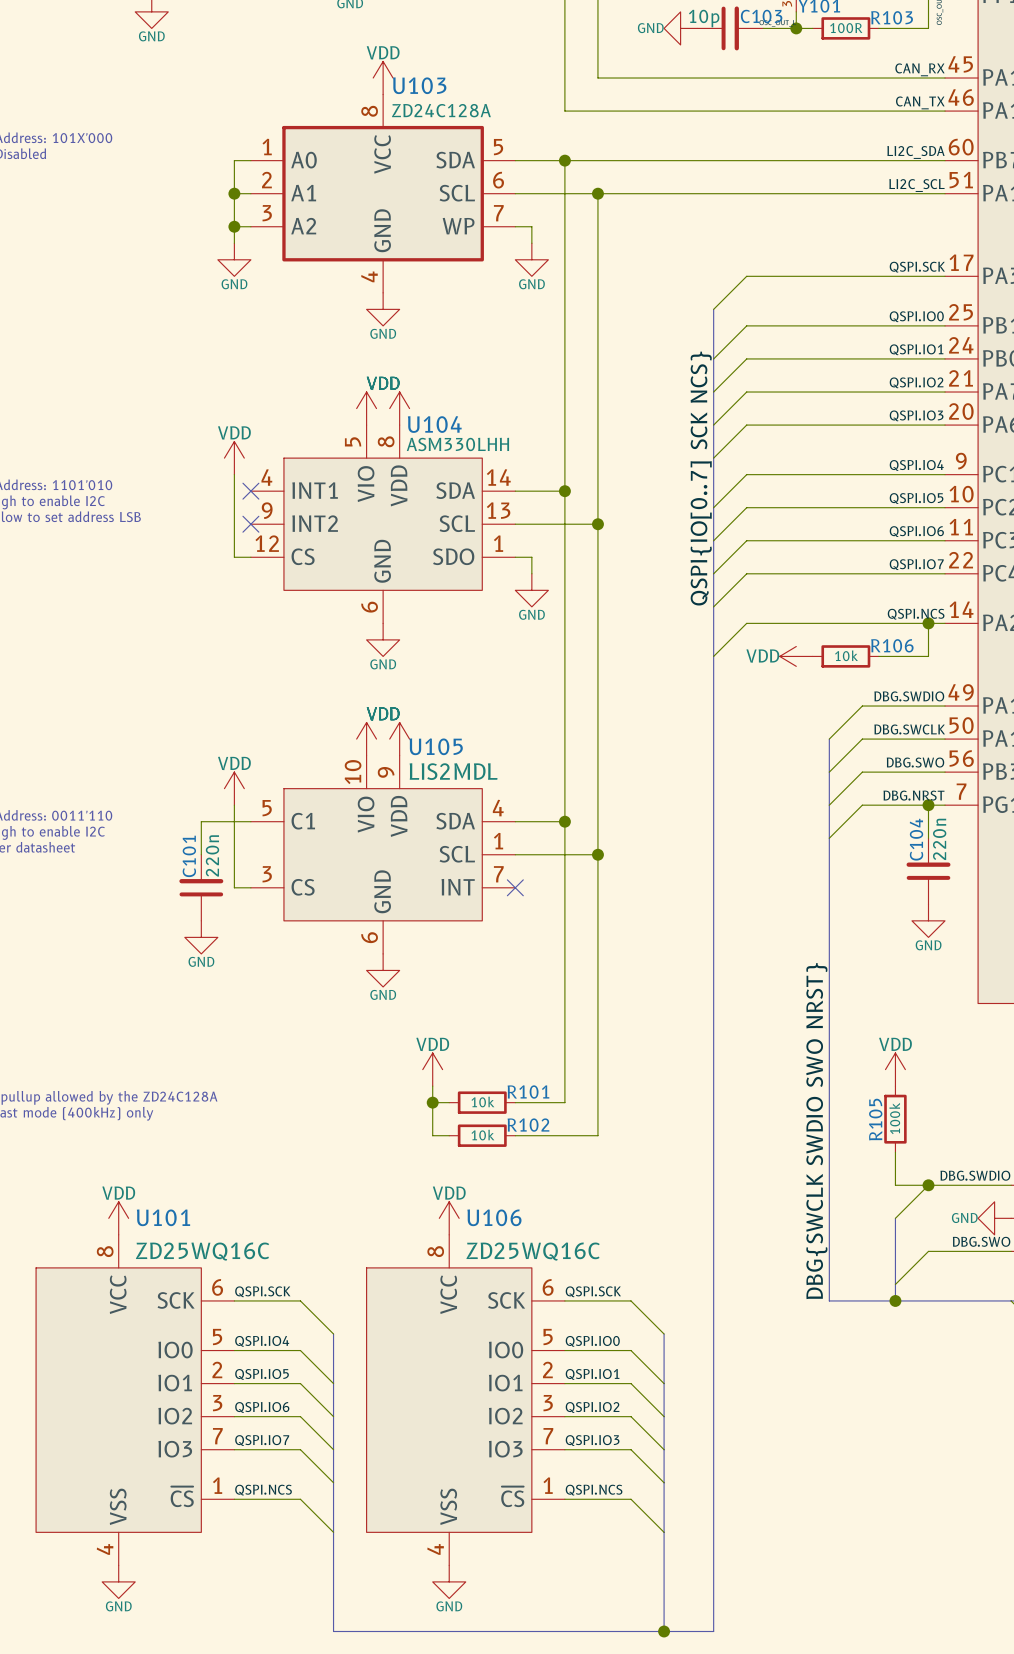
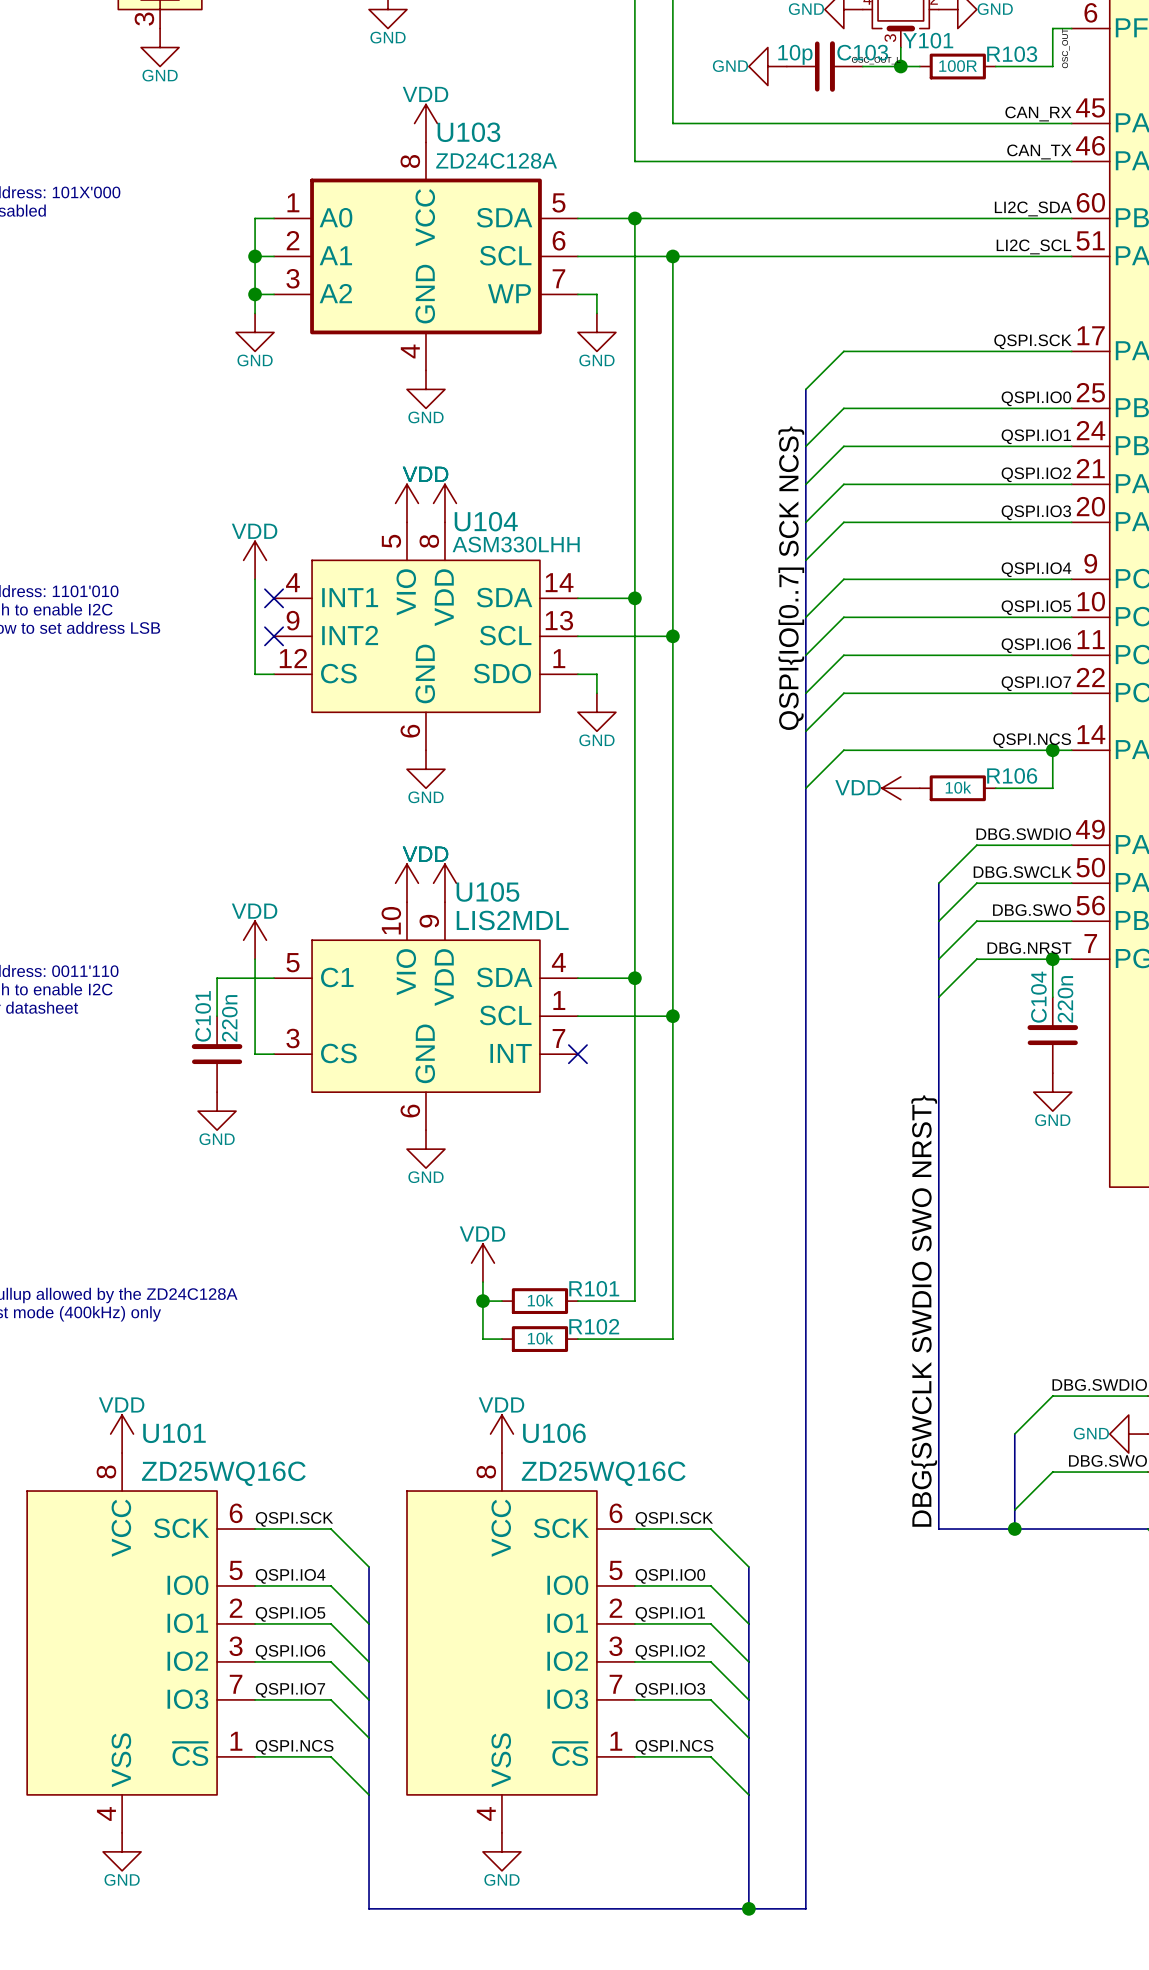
power symbol: VDD (895, 1069) -> none
R105: 100k (895, 1119) -> none
wire: (895, 1152) (895, 1185) (928, 1185) -> none
junction: (928, 1185) -> none

